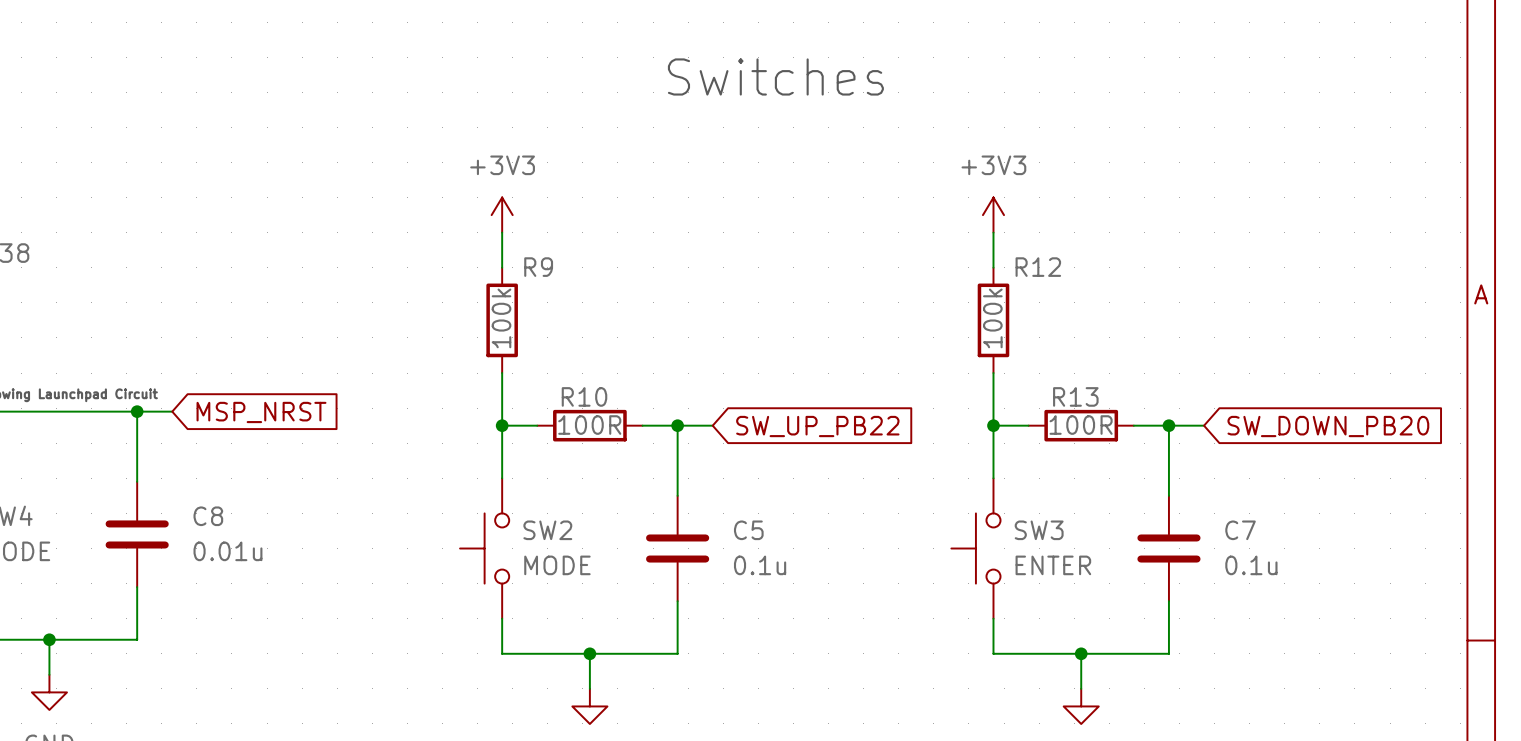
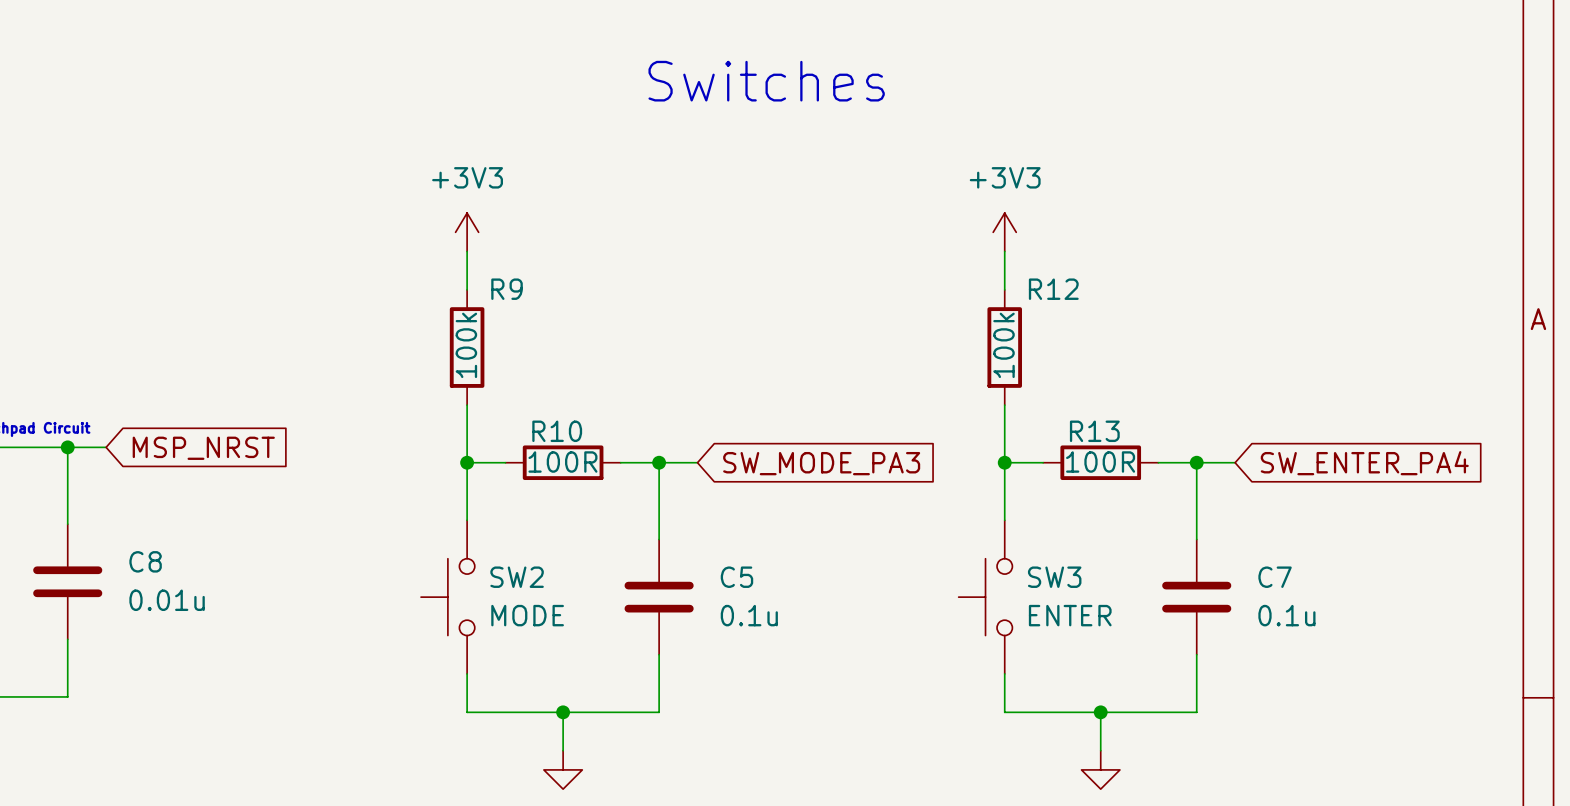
global label: SW_UP_PB22 (817, 426) -> SW_MODE_PA3 (821, 463)
global label: SW_DOWN_PB20 (1328, 426) -> SW_ENTER_PA4 (1364, 463)

